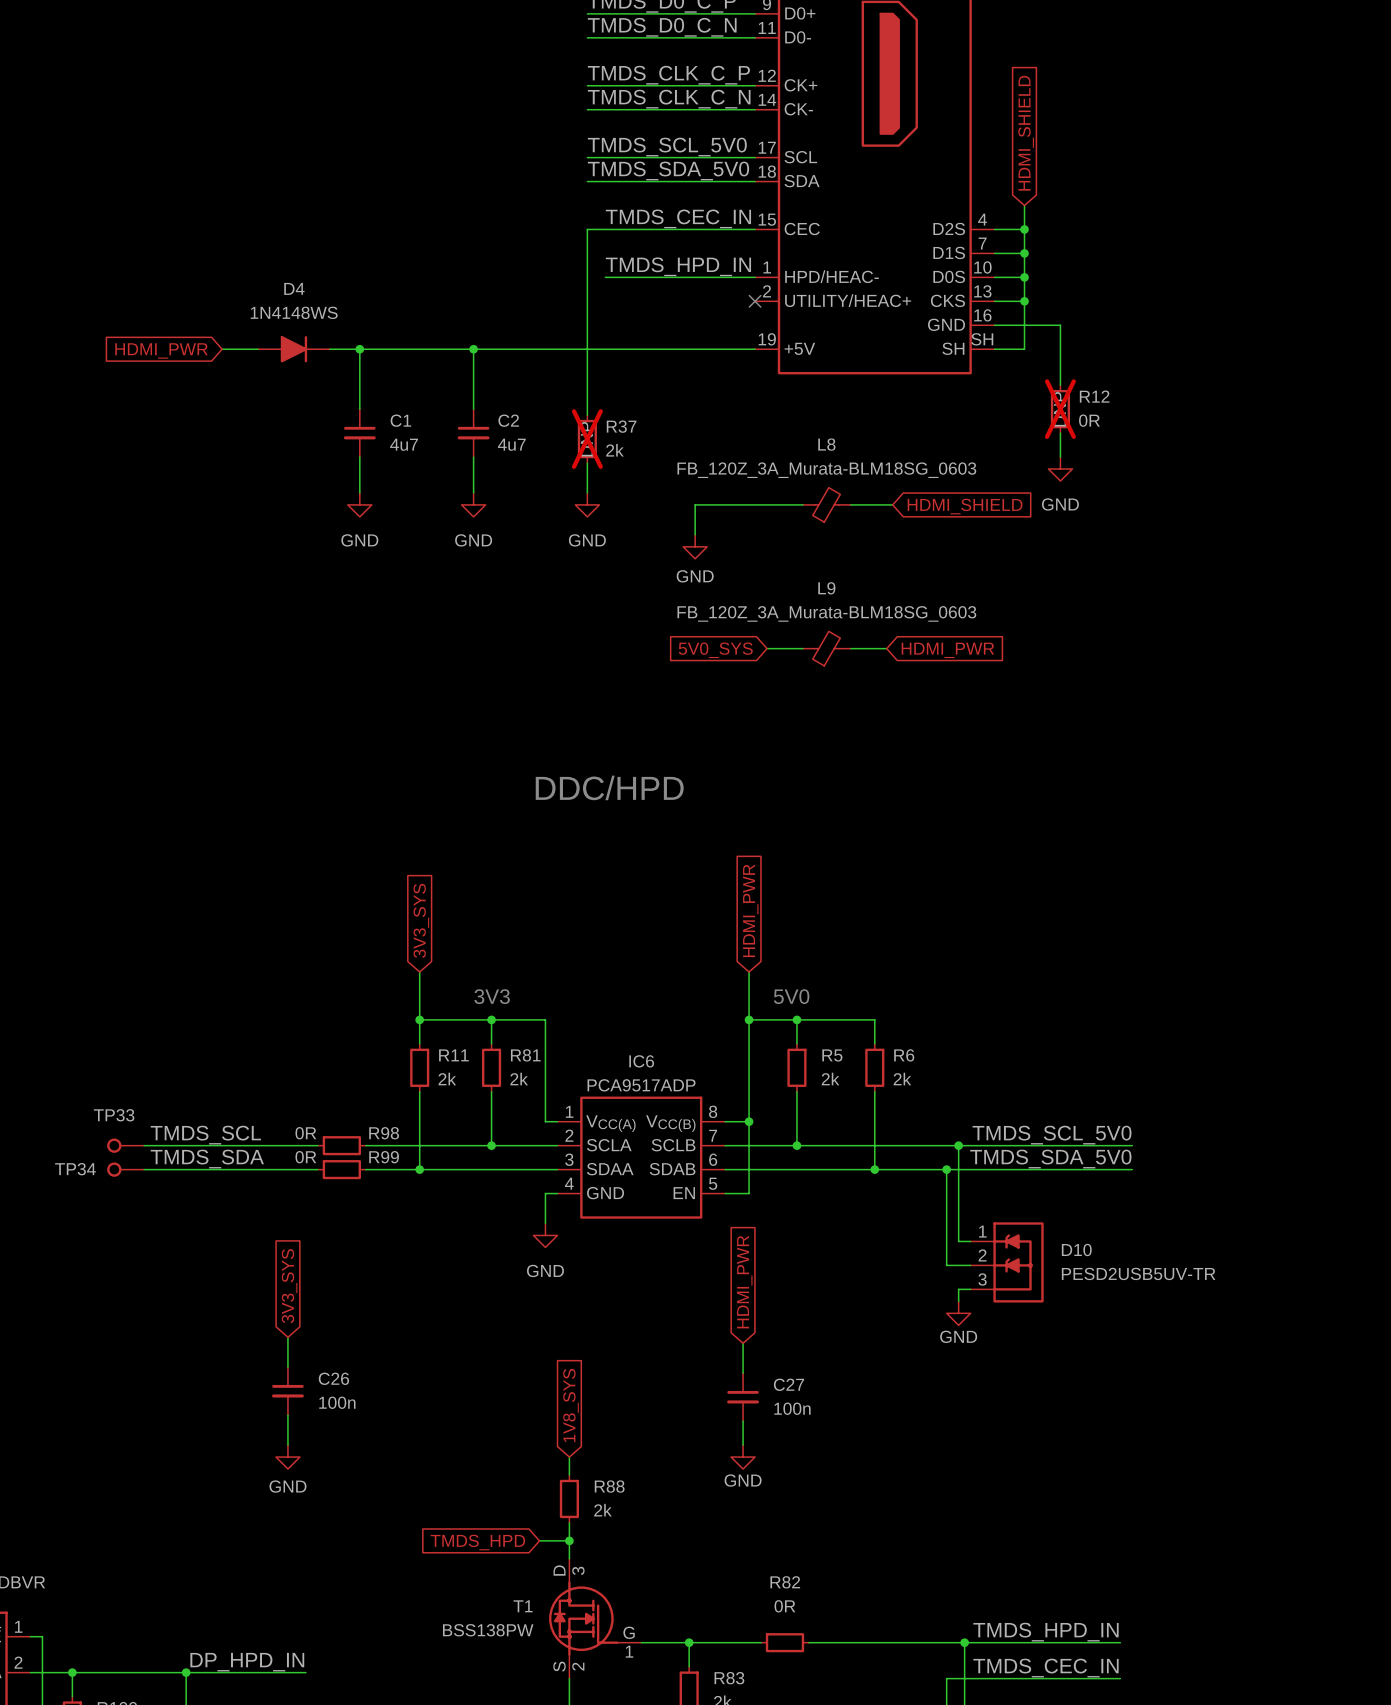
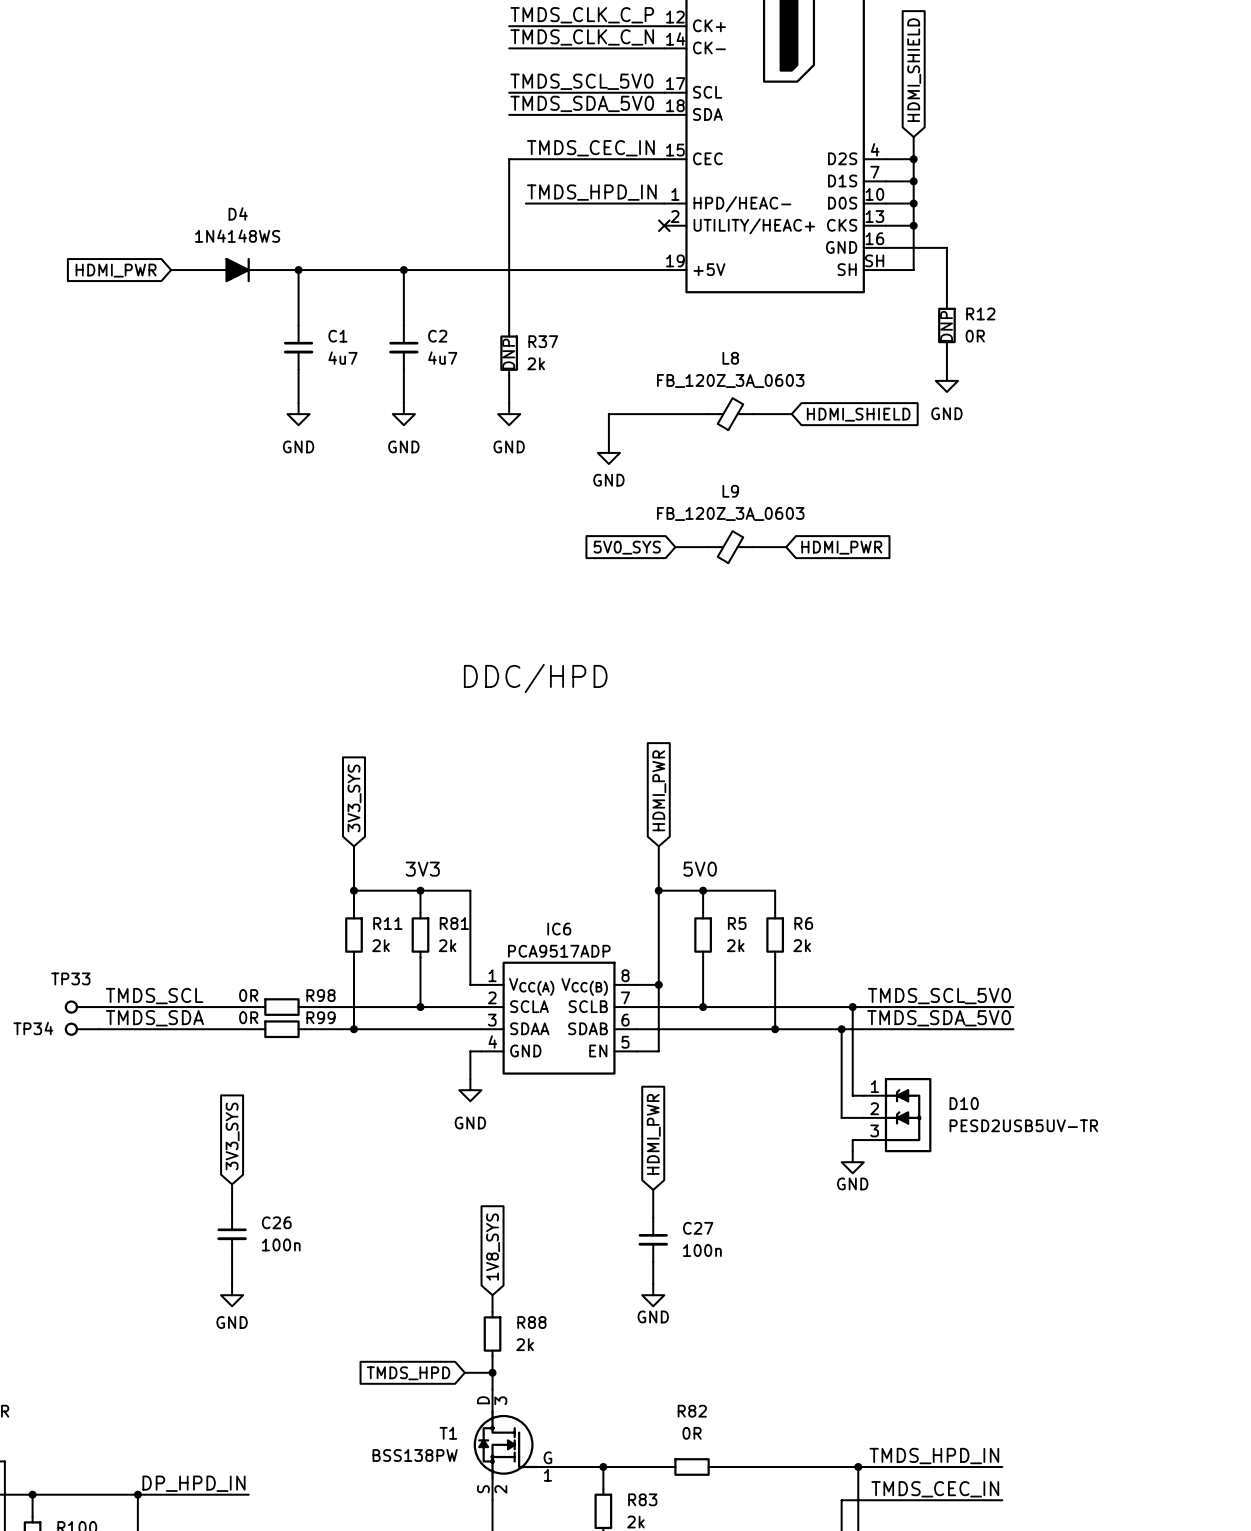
R12 do-not-place cross: (1060, 409) -> none
R37 do-not-place cross: (587, 439) -> none
L8 value: FB_120Z_3A_Murata-BLM18SG_0603 (826, 470) -> FB_120Z_3A_0603 (730, 380)
L9 value: FB_120Z_3A_Murata-BLM18SG_0603 (826, 613) -> FB_120Z_3A_0603 (730, 513)

